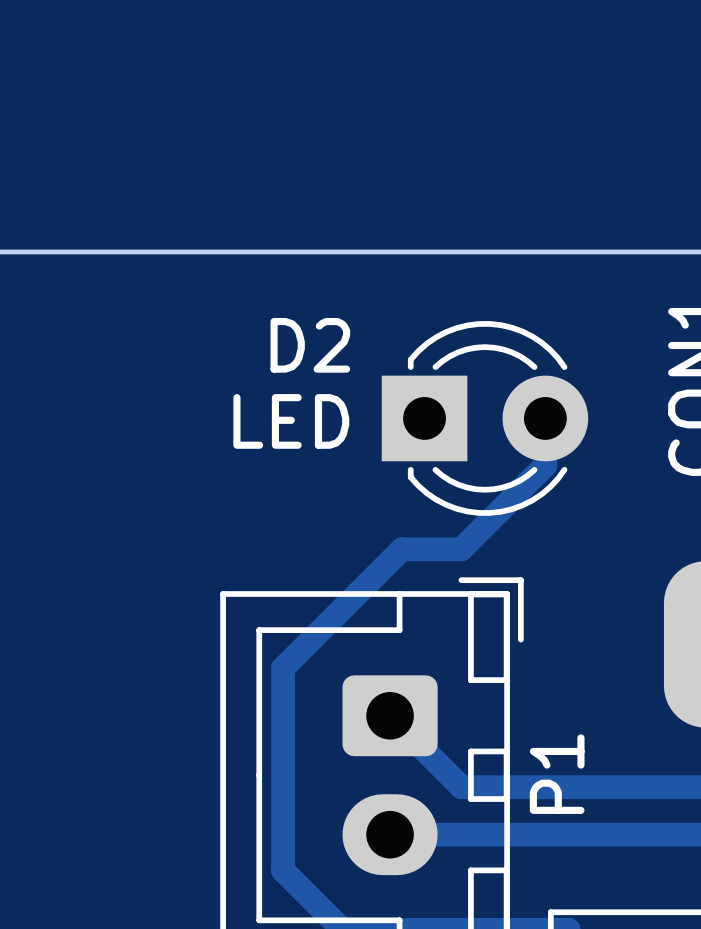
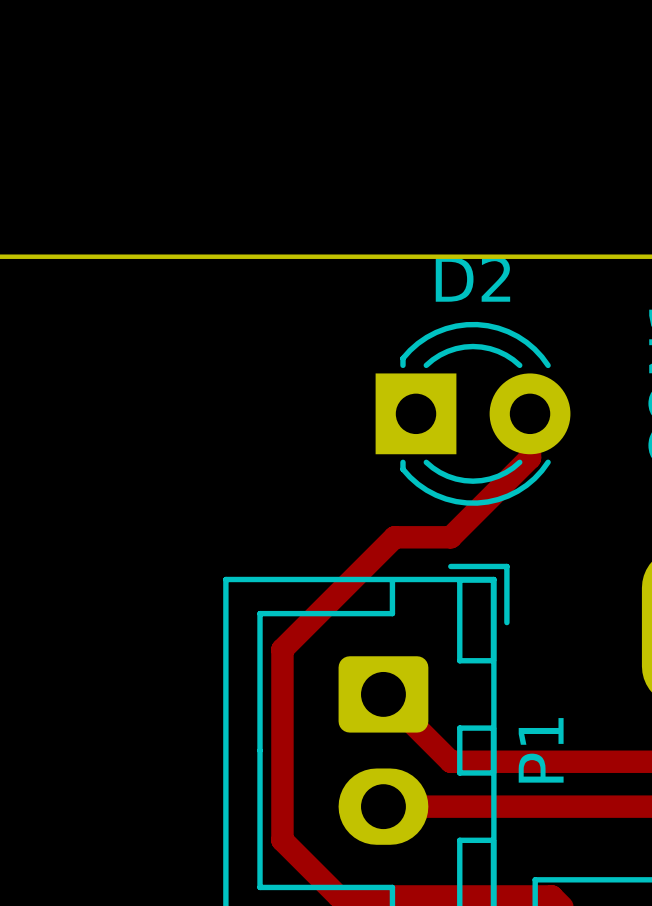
D2 name position: D2 (310, 345) -> D2 (472, 278)
D2 value: LED (291, 421) -> none

